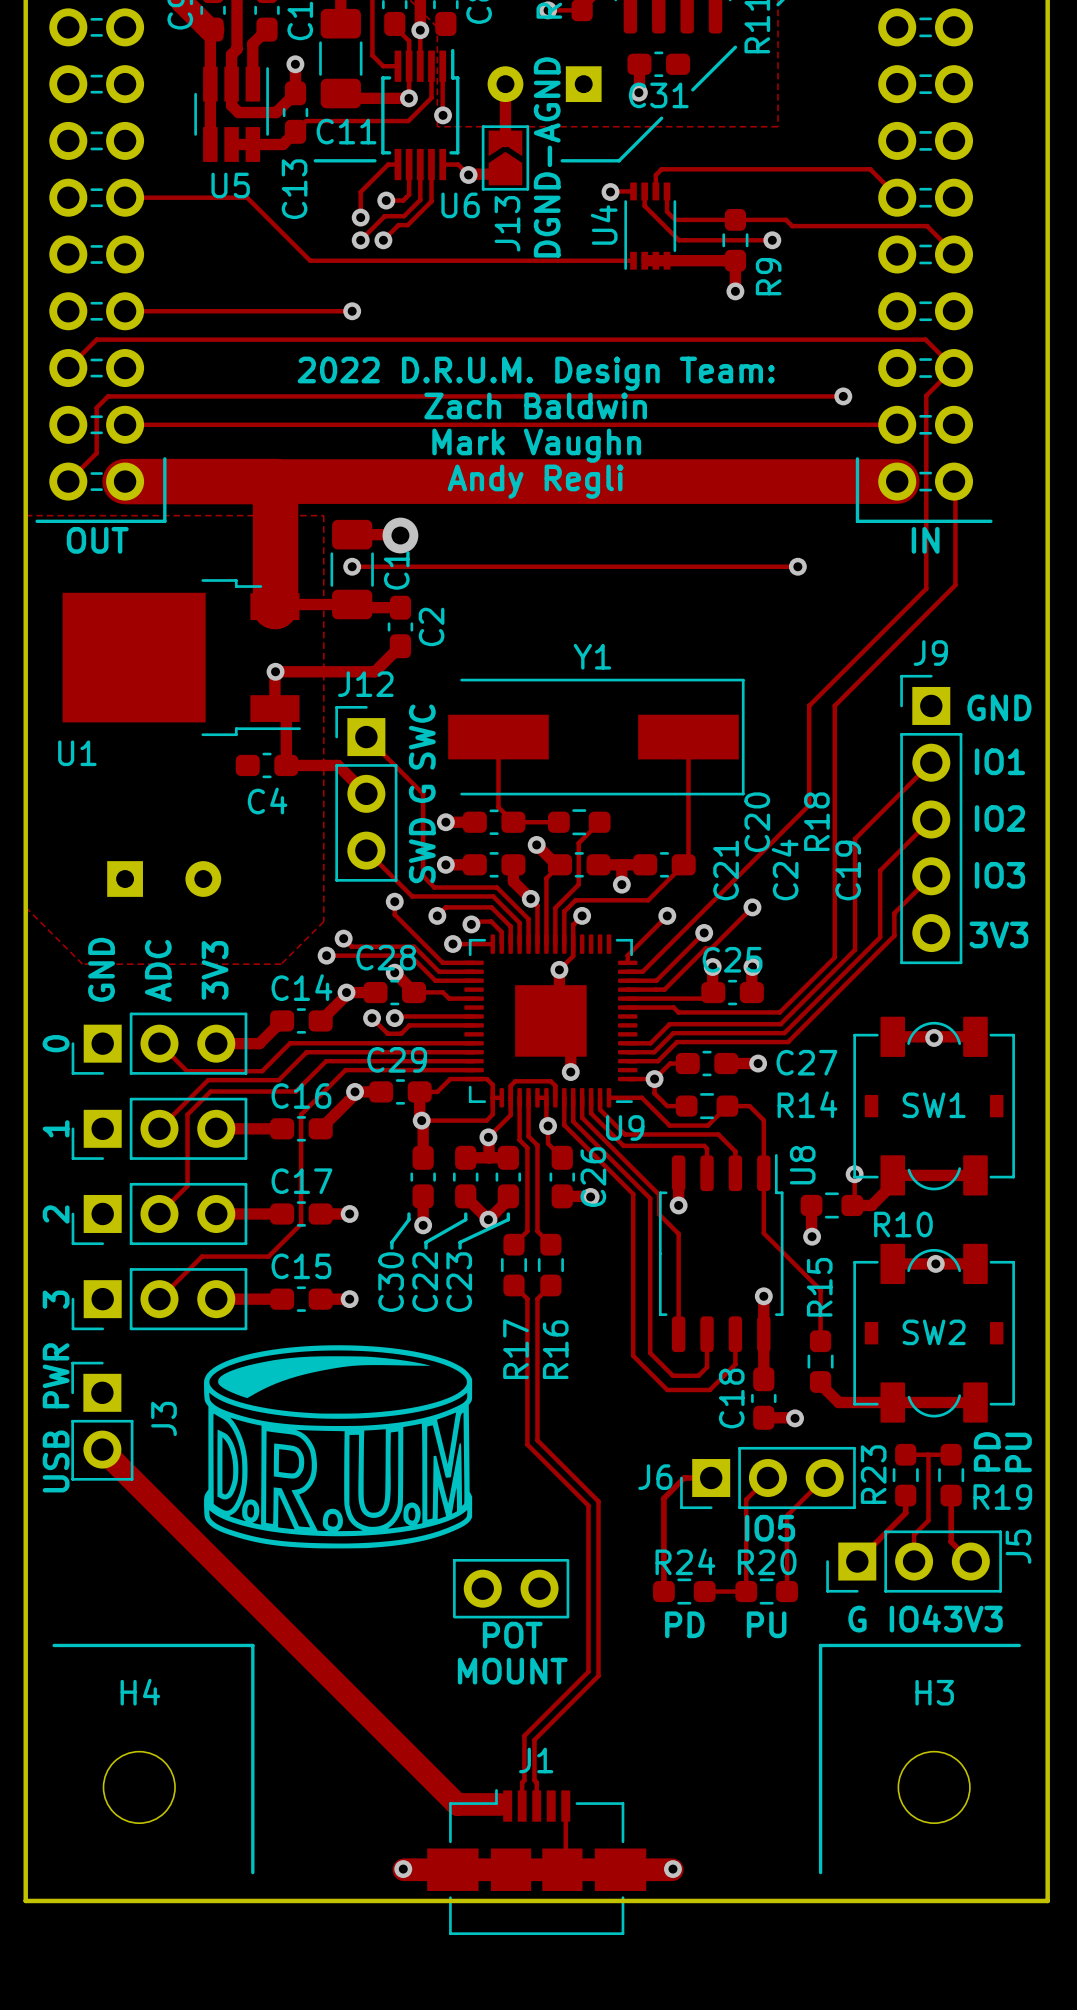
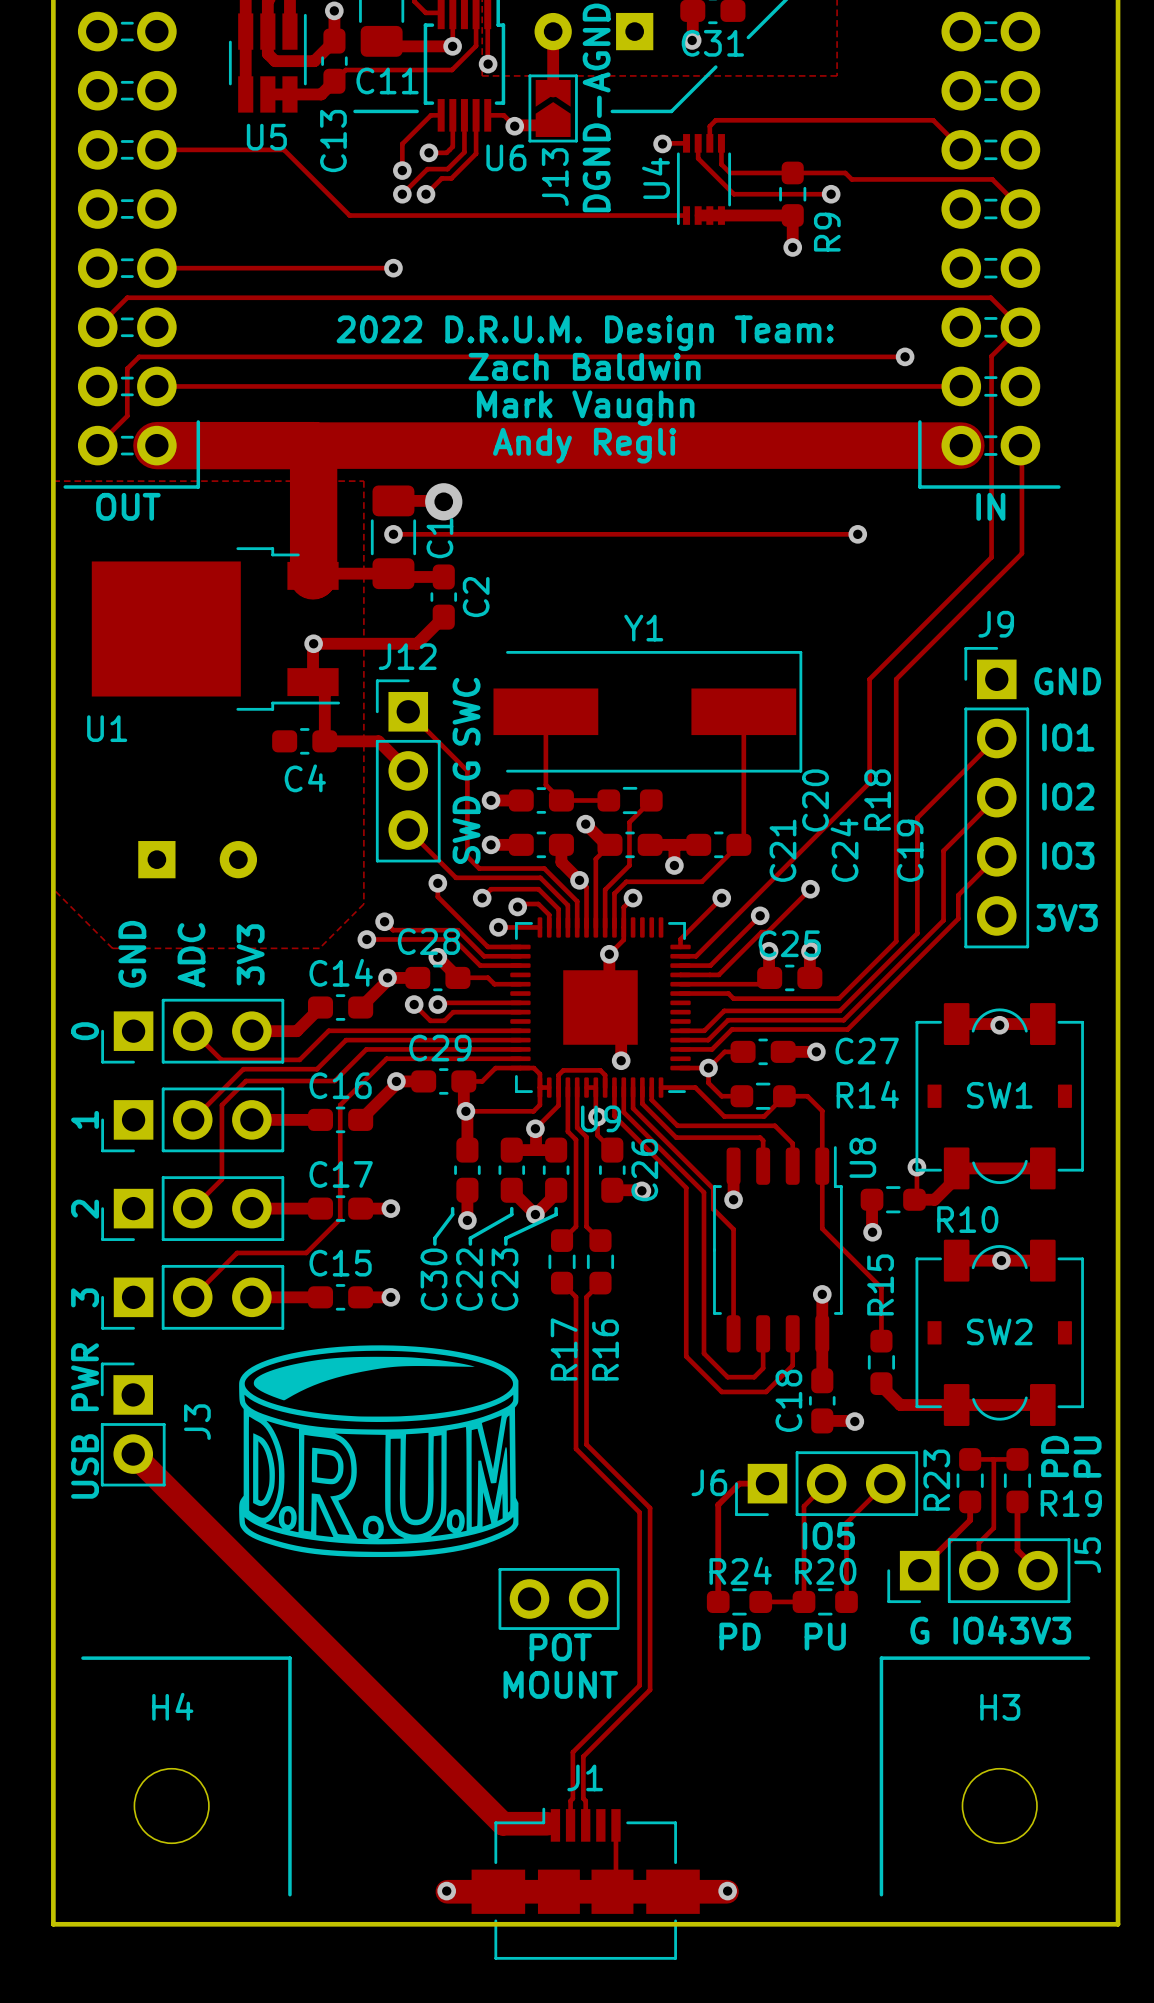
U9 name position: U9 (625, 1127) -> U9 (601, 1118)

